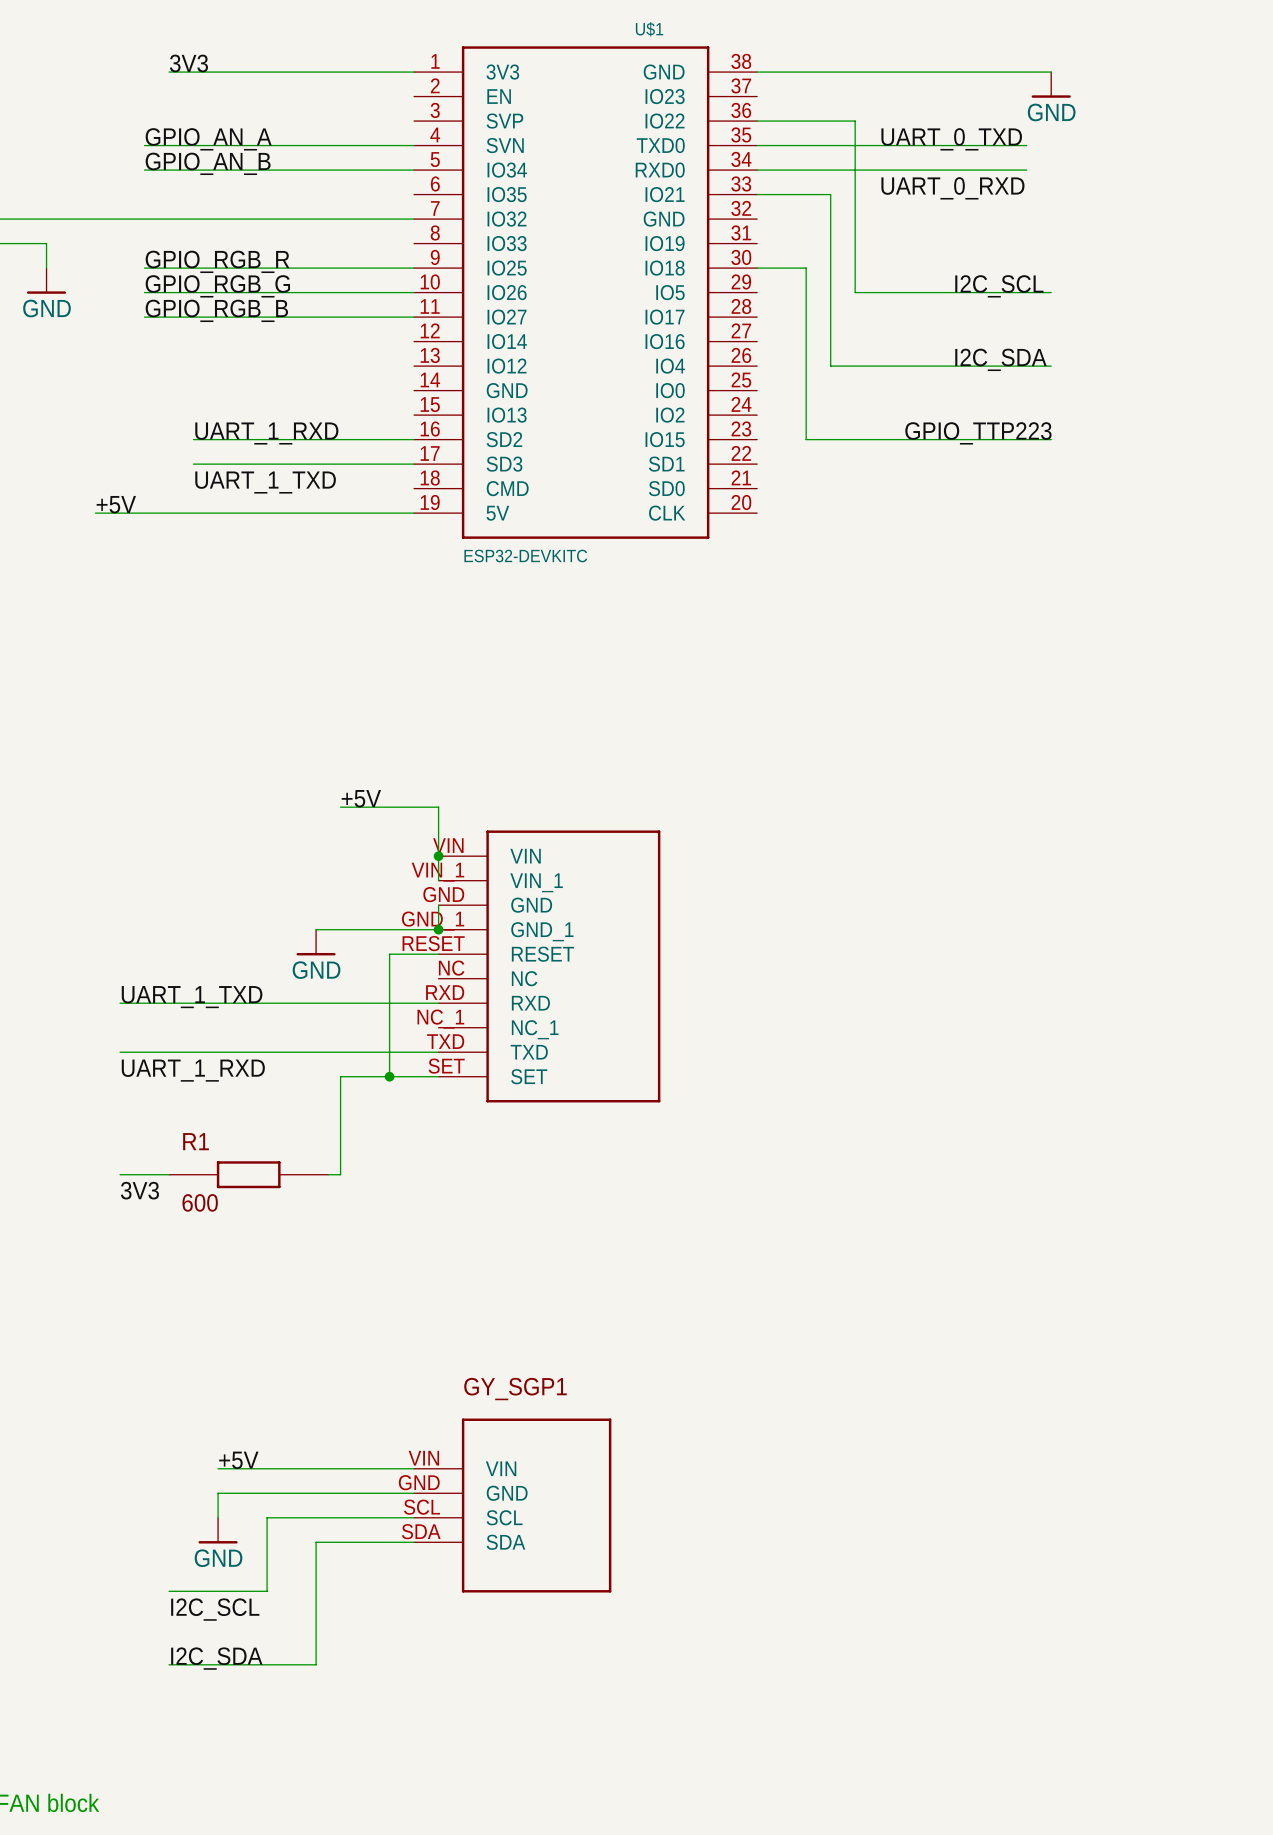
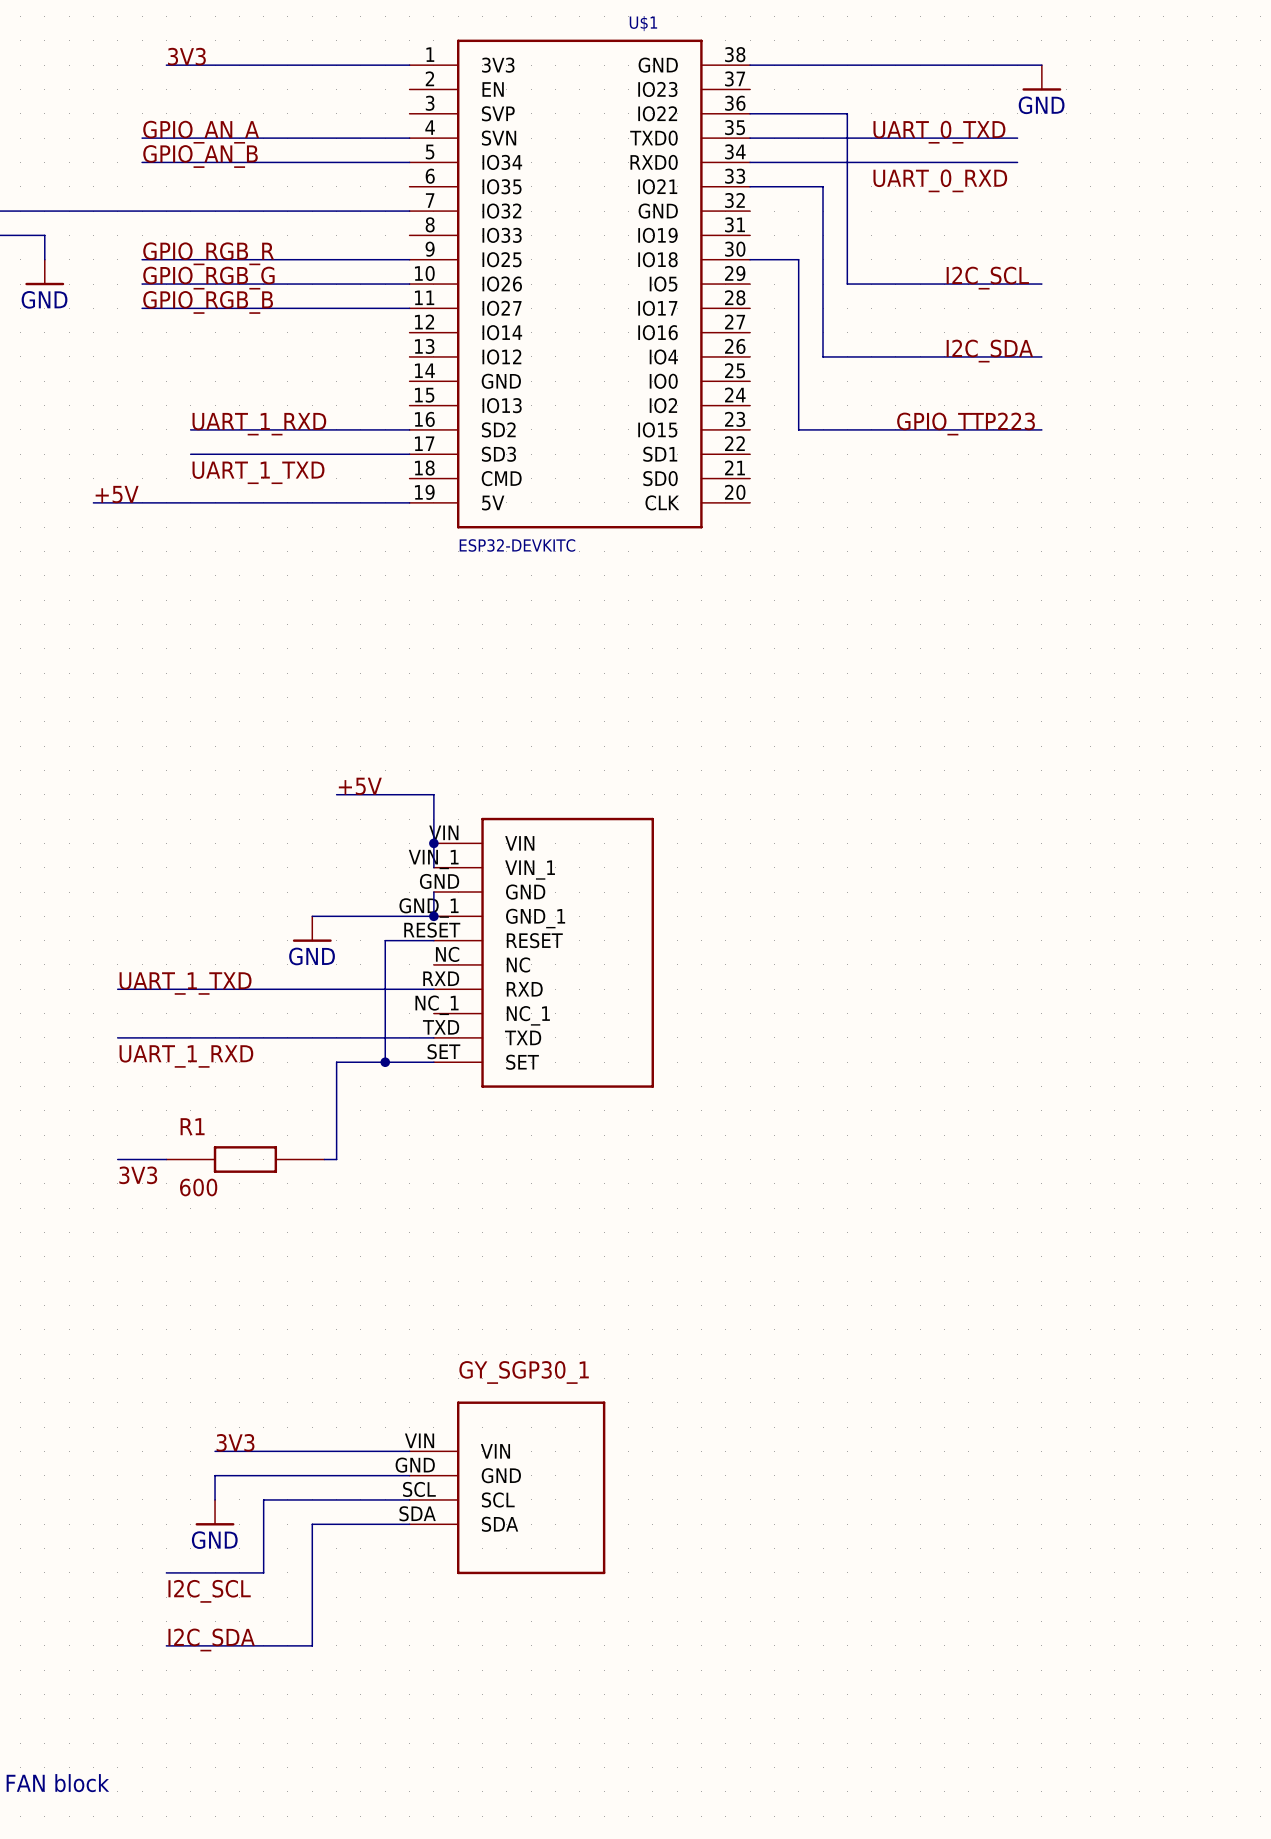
GY_SGP1 name: GY_SGP1 (515, 1389) -> GY_SGP30_1 (524, 1372)
label: +5V (238, 1460) -> 3V3 (235, 1442)

